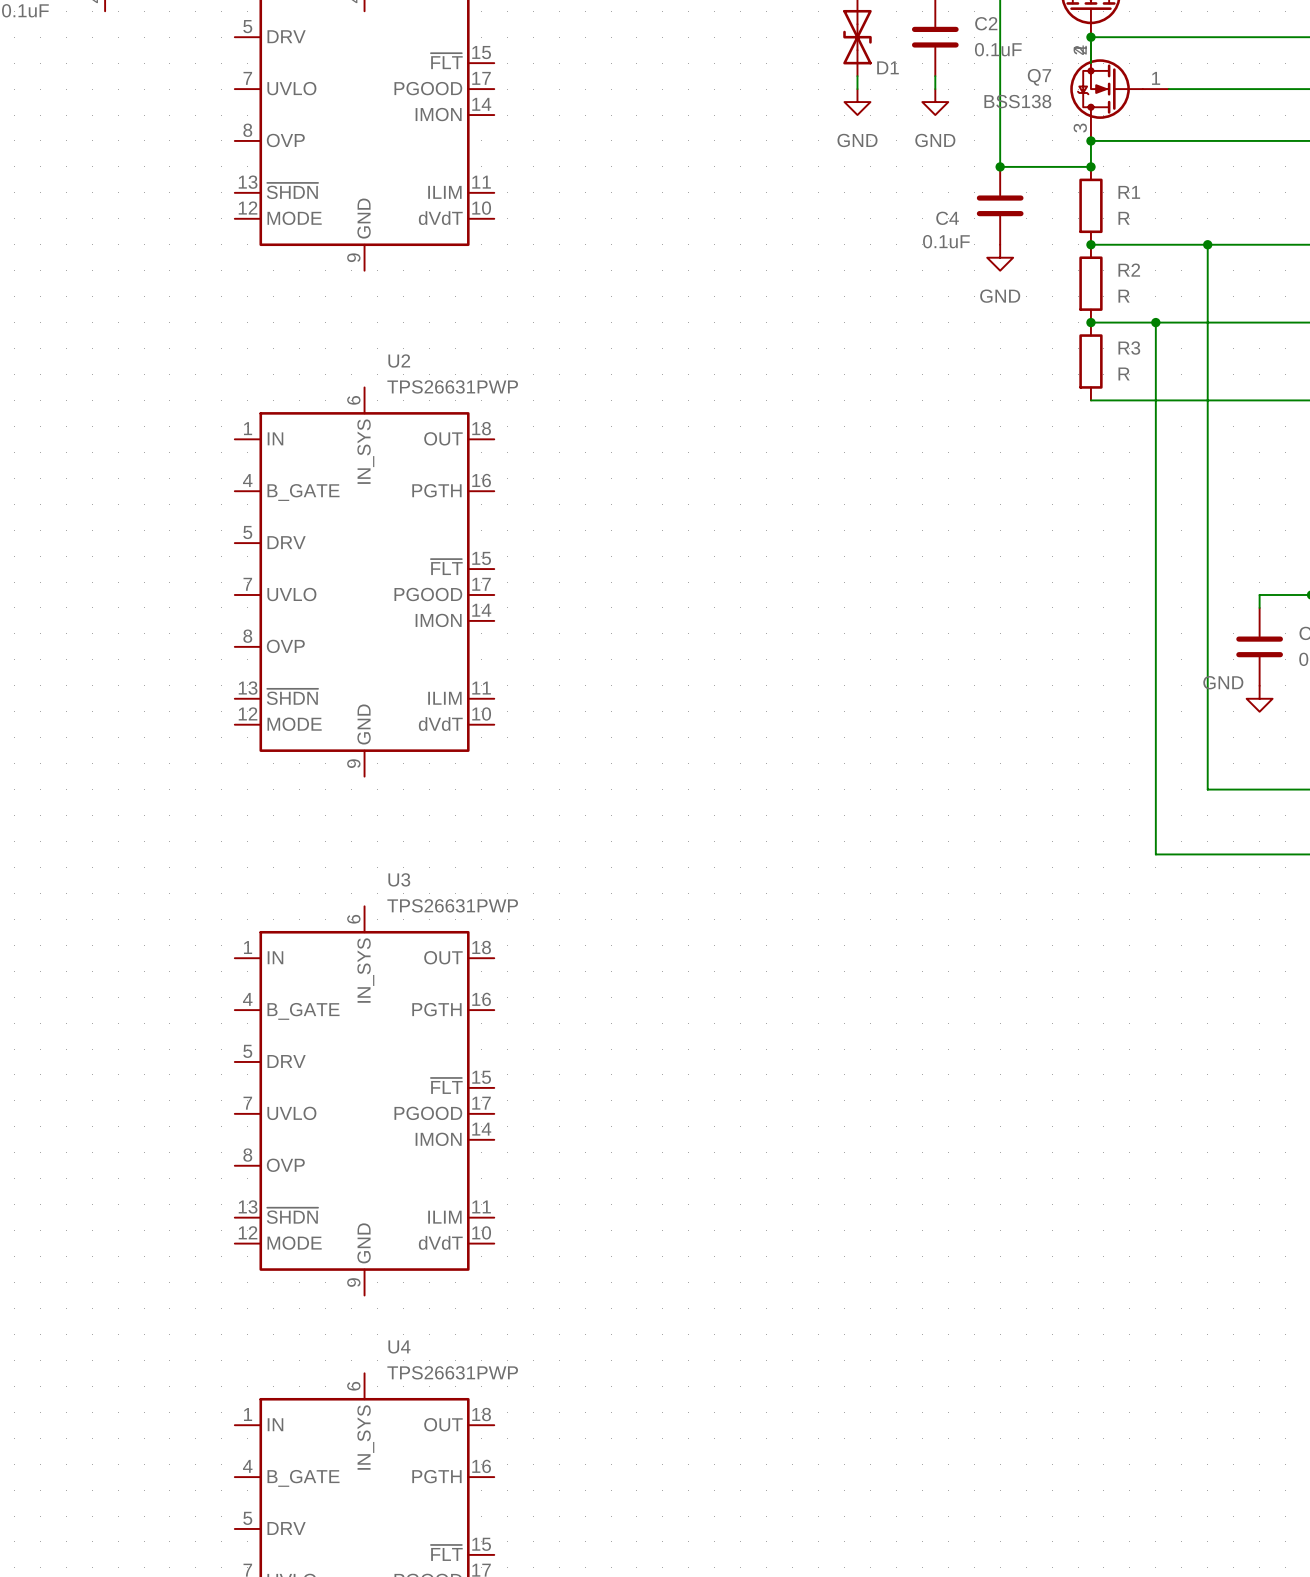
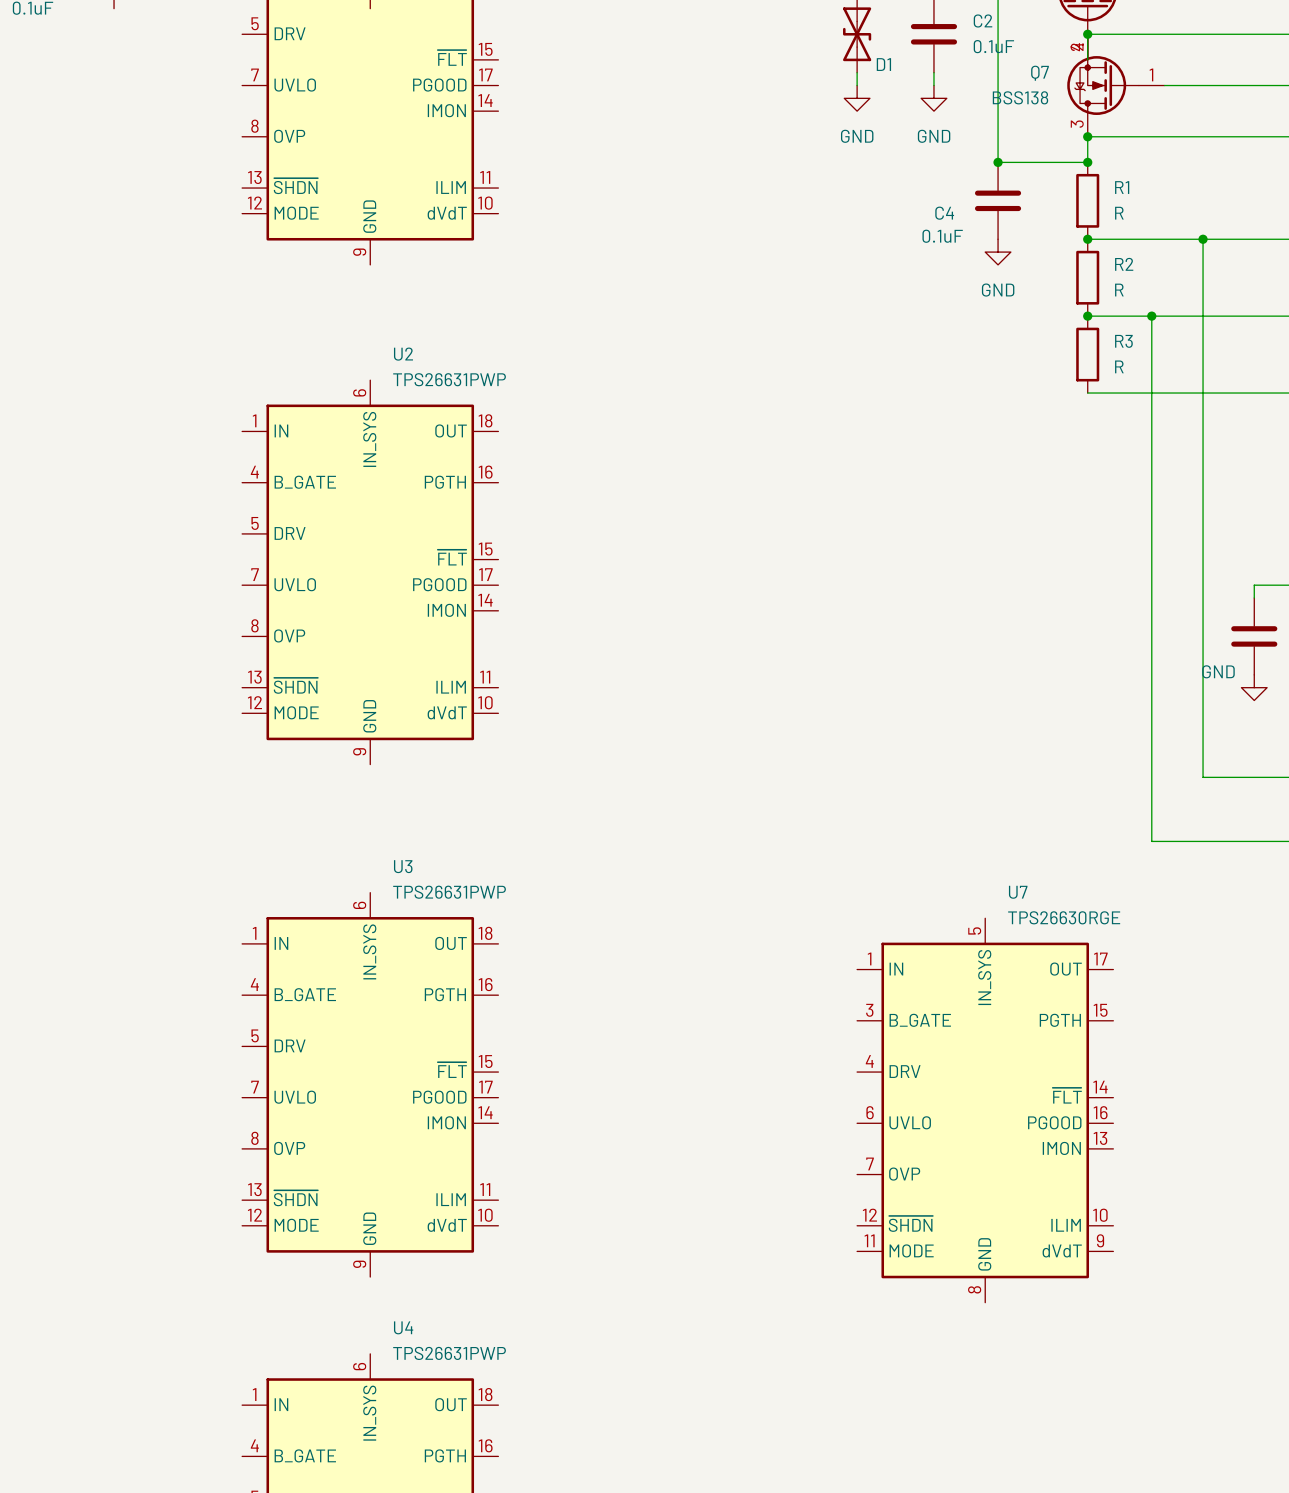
U7: none -> TPS26630RGE (985, 1110)

